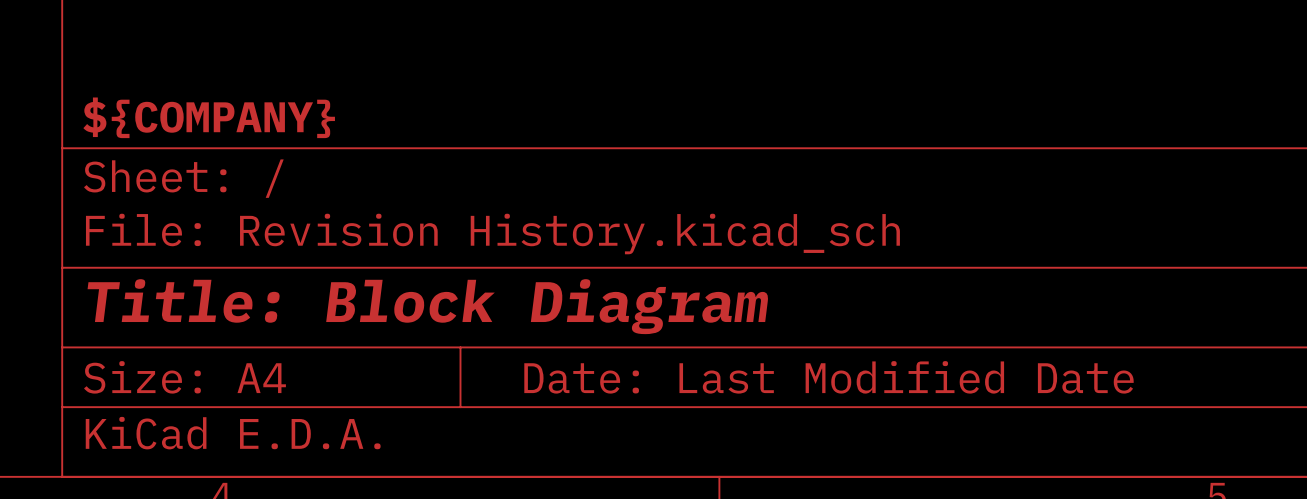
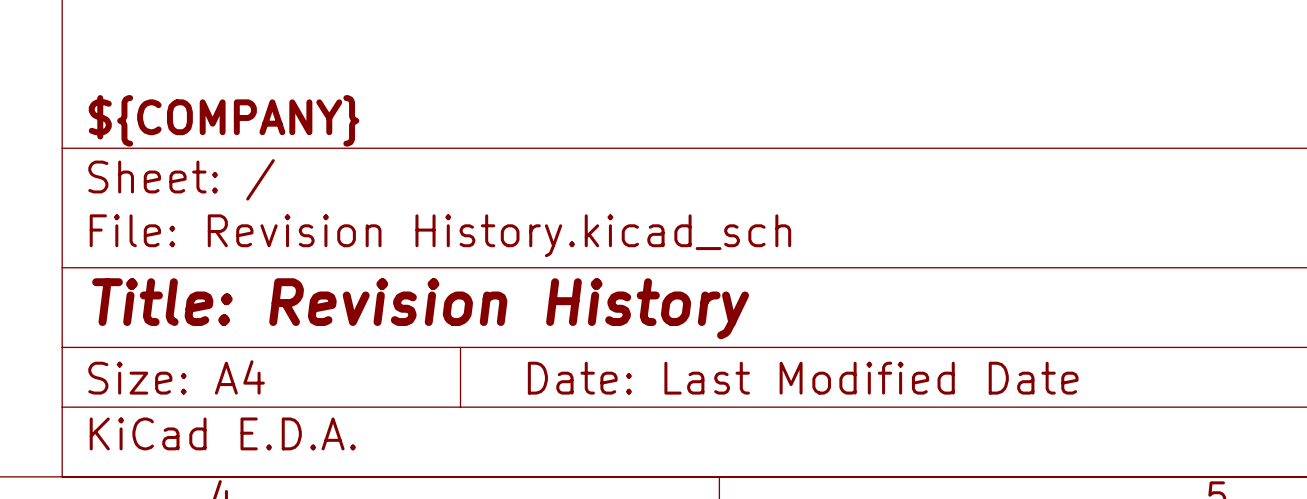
title block: Title: Block Diagram (428, 306) -> Title: Revision History (420, 308)

